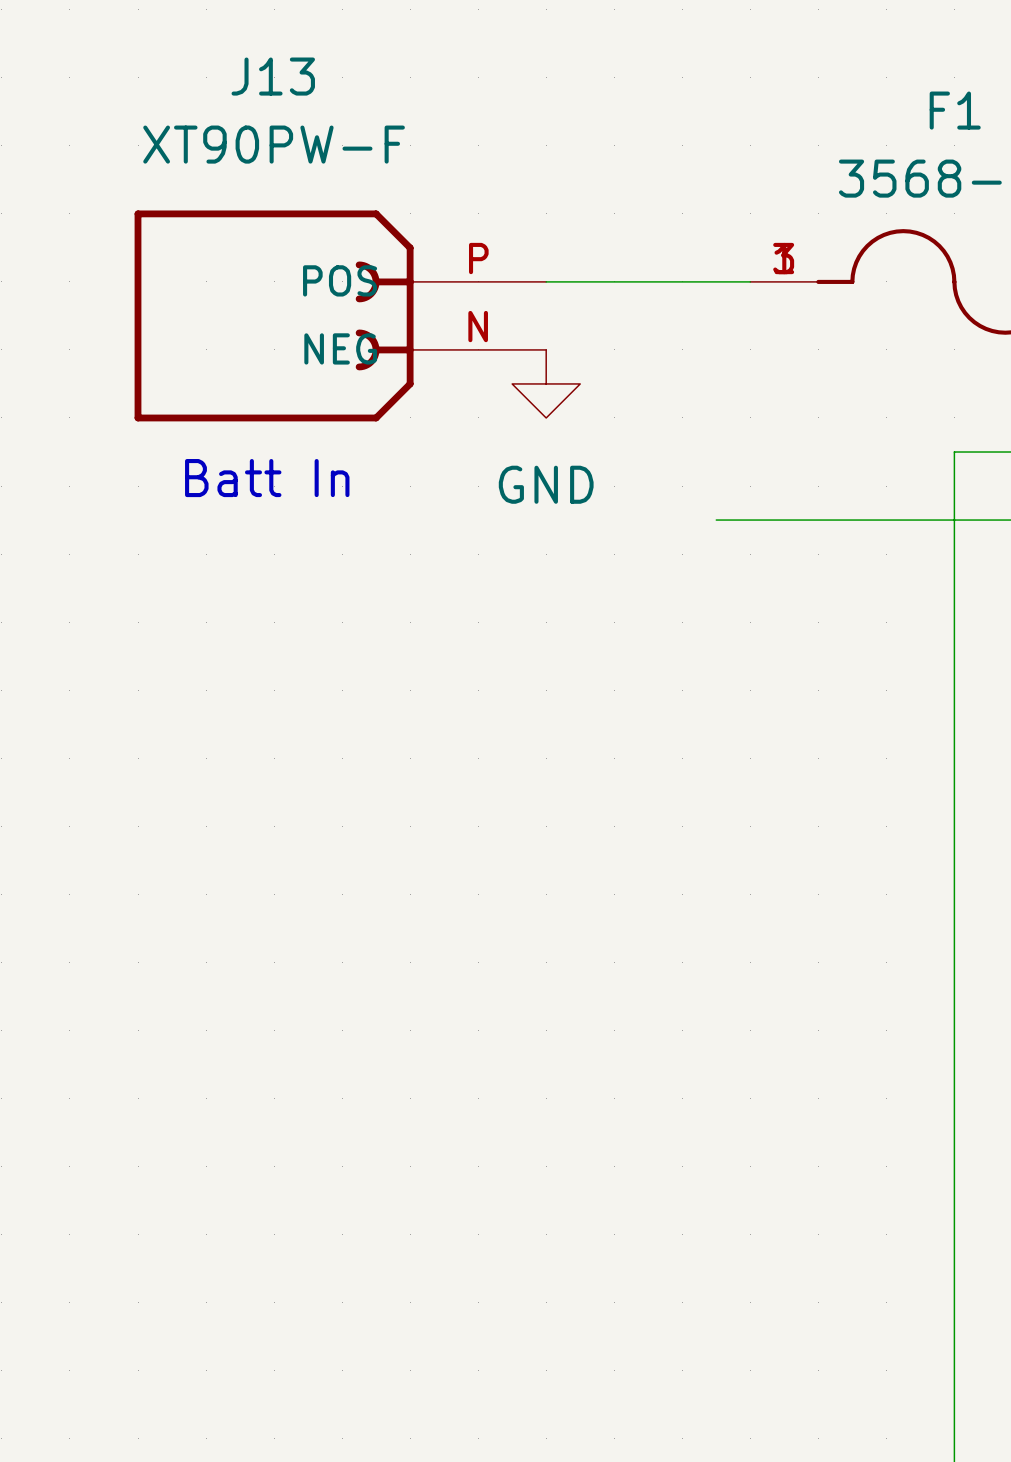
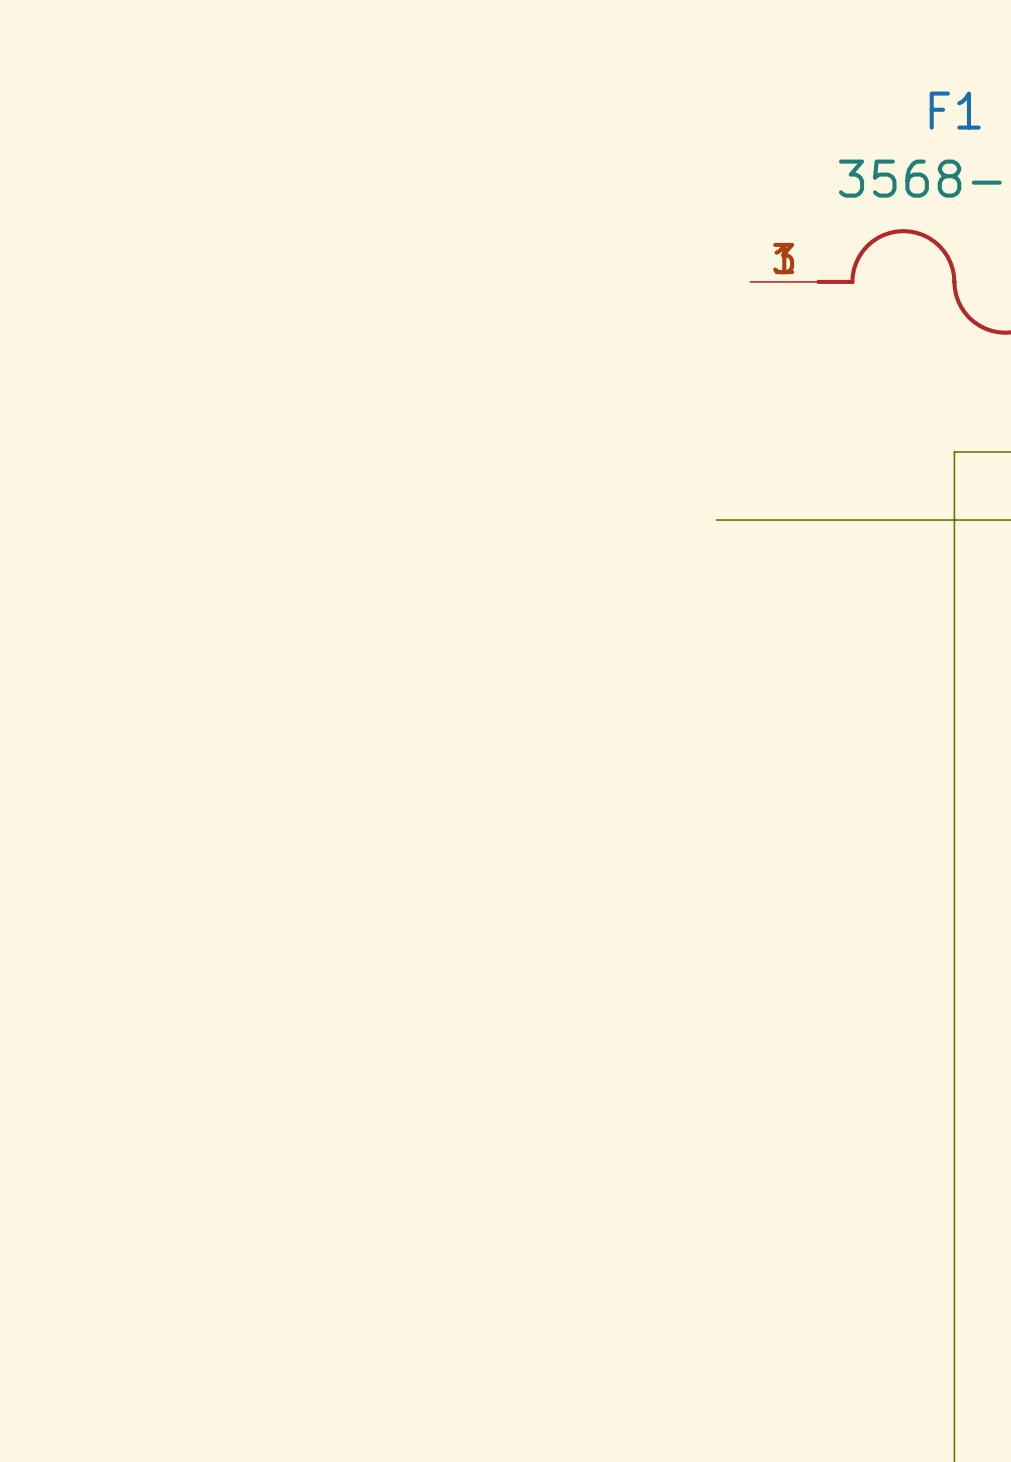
wire: (546, 281) (750, 281) -> none
J13: XT90PW-F (340, 315) -> none
power symbol: GND (546, 383) -> none
text: Batt In (267, 478) -> none

